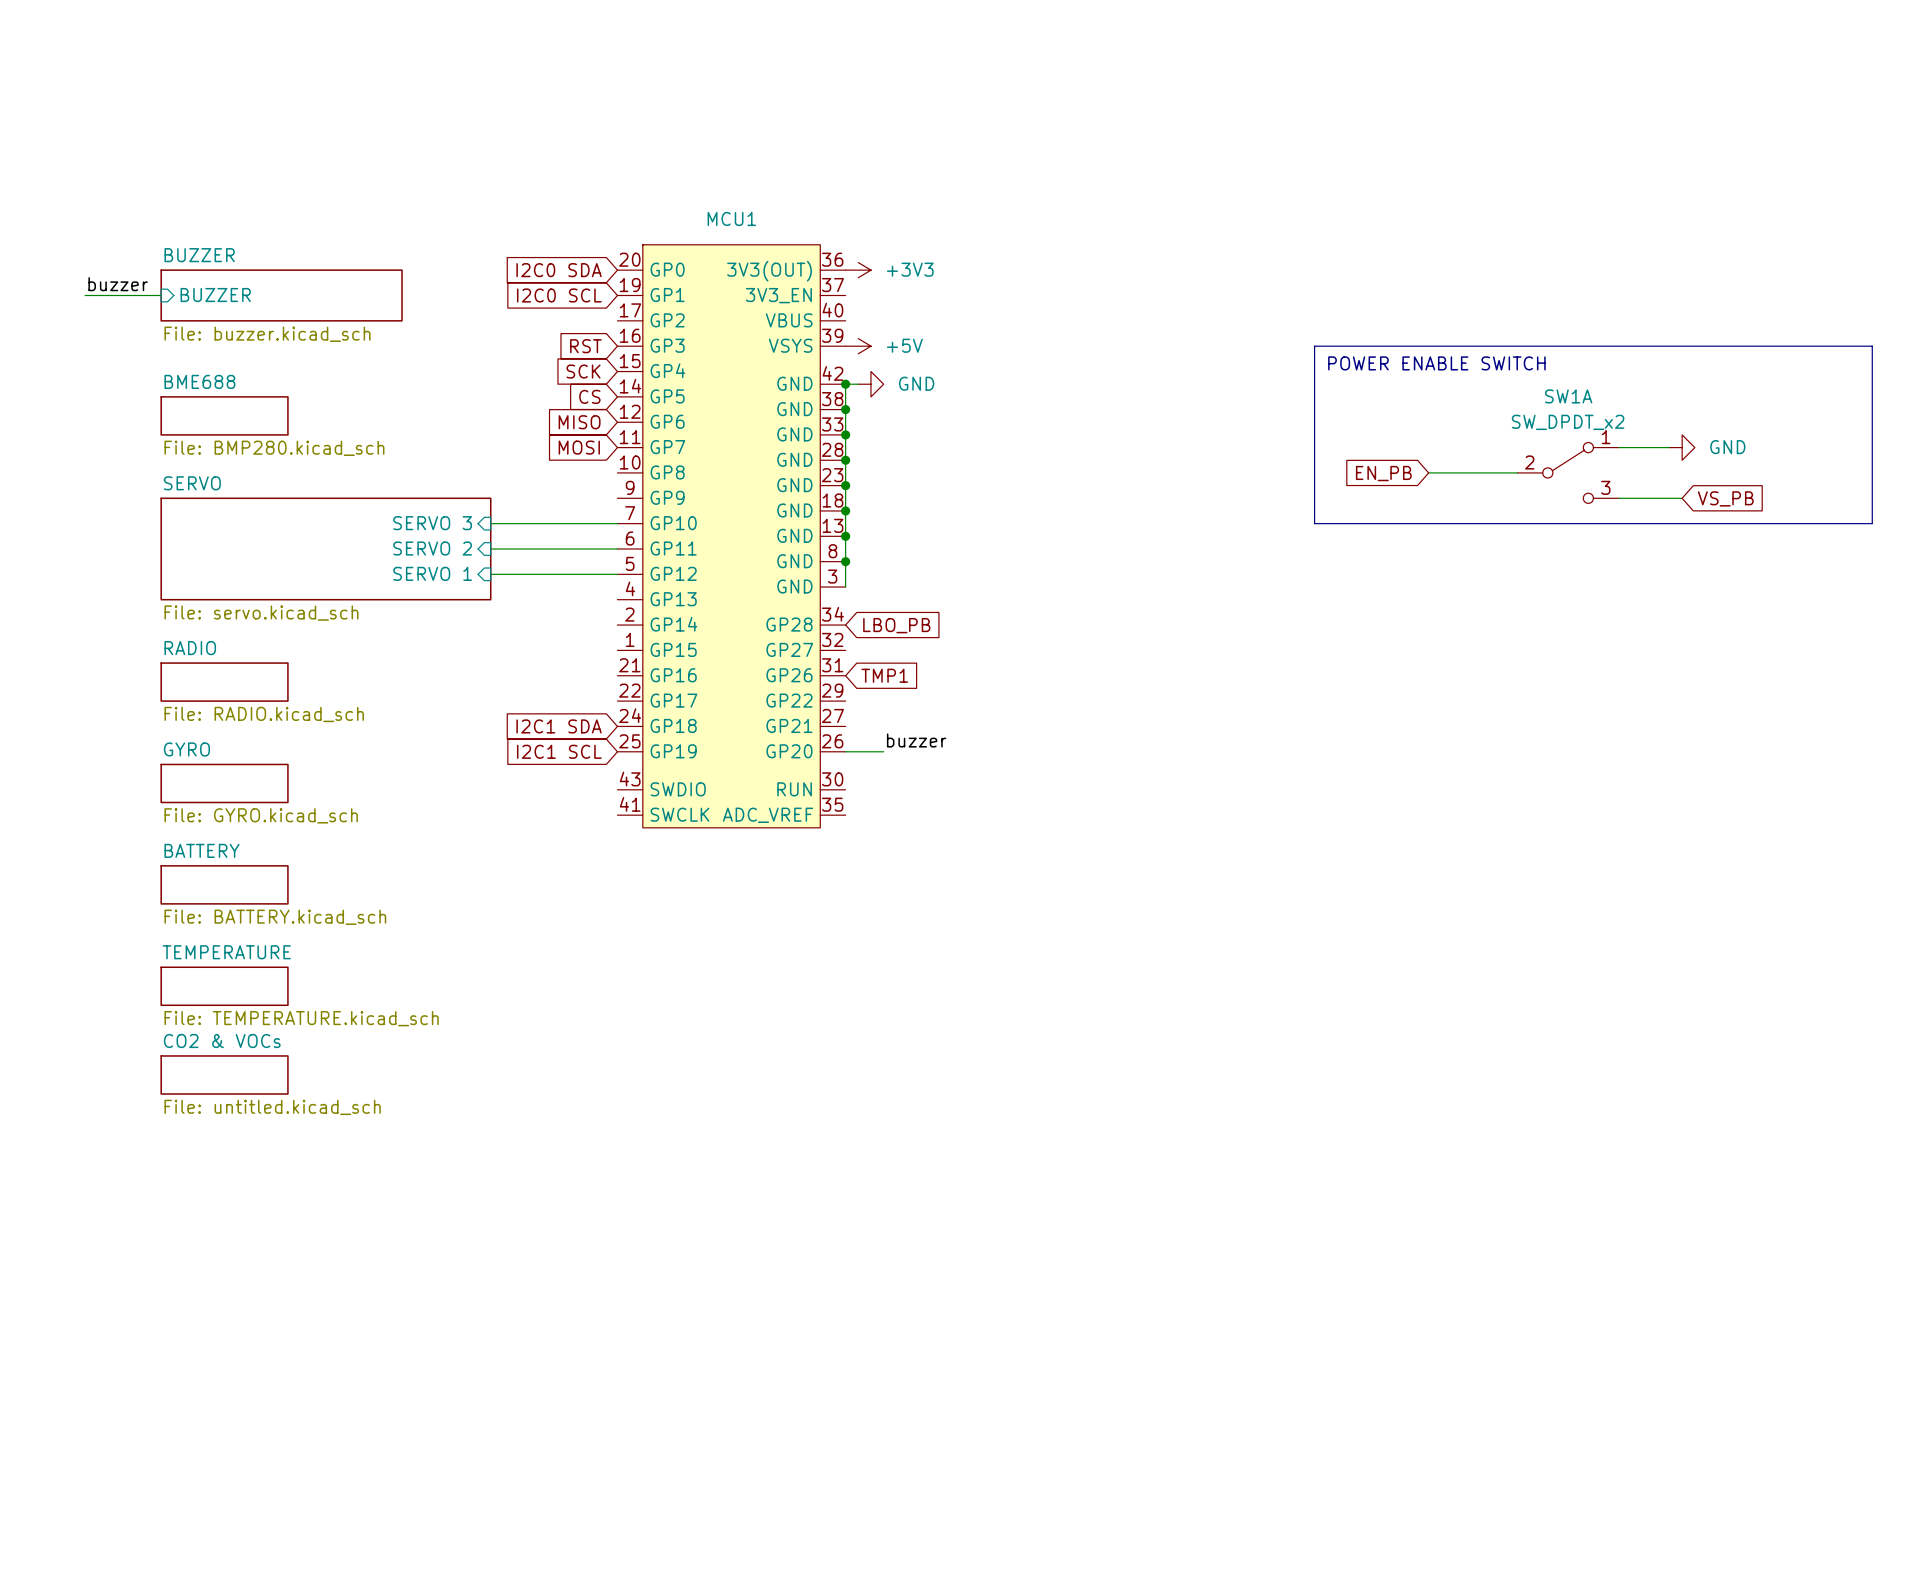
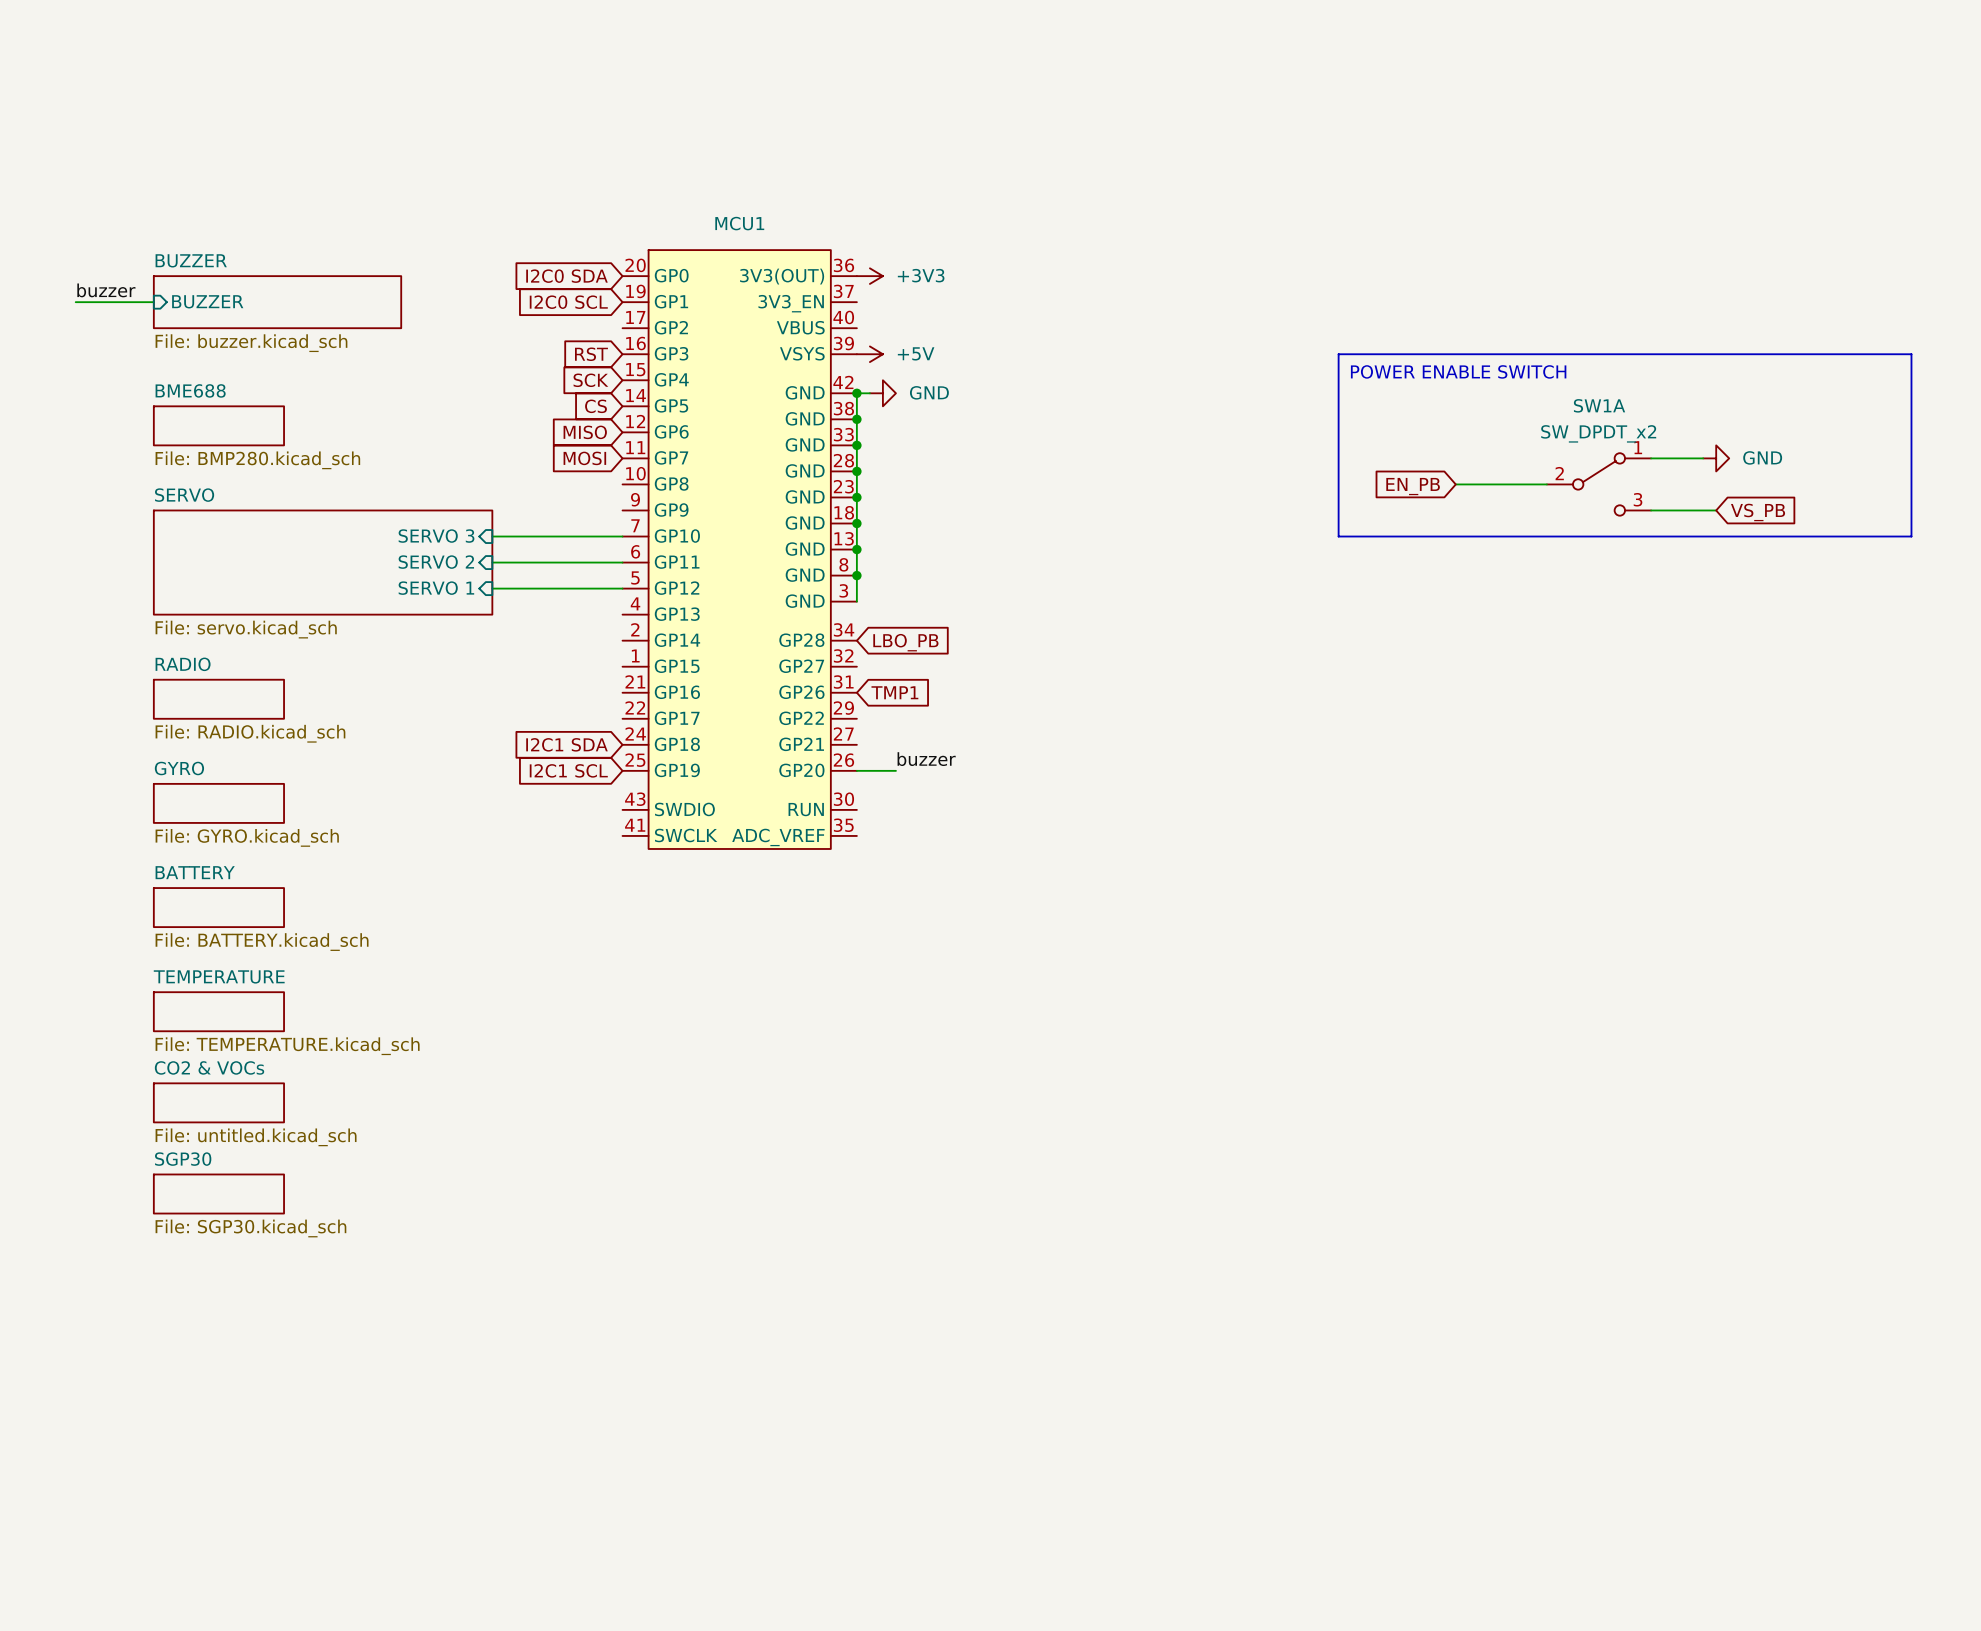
sheet SGP30: none -> File: SGP30.kicad_sch (218, 1194)

